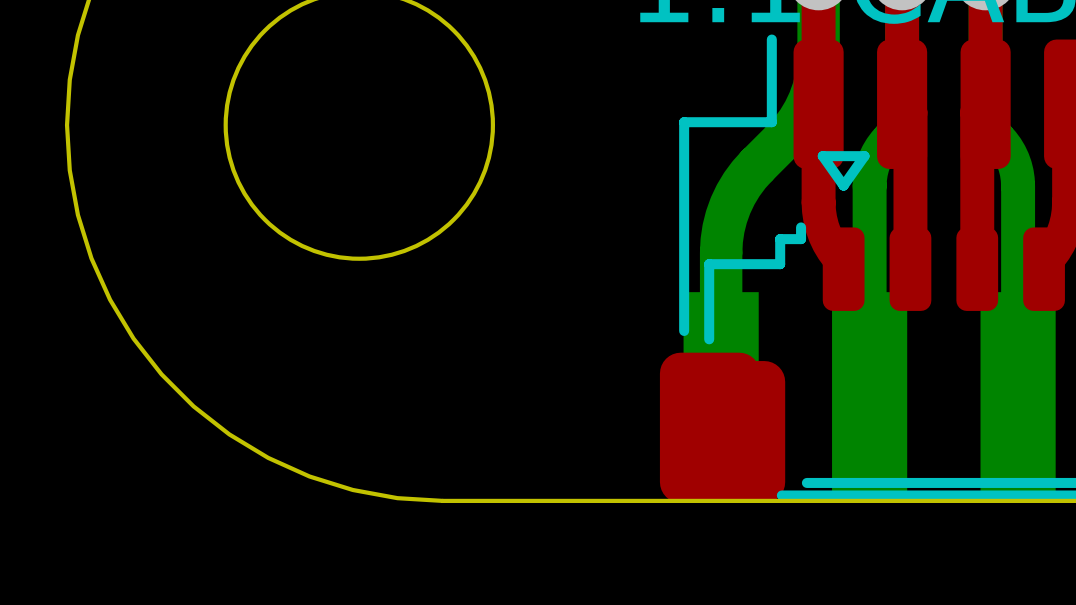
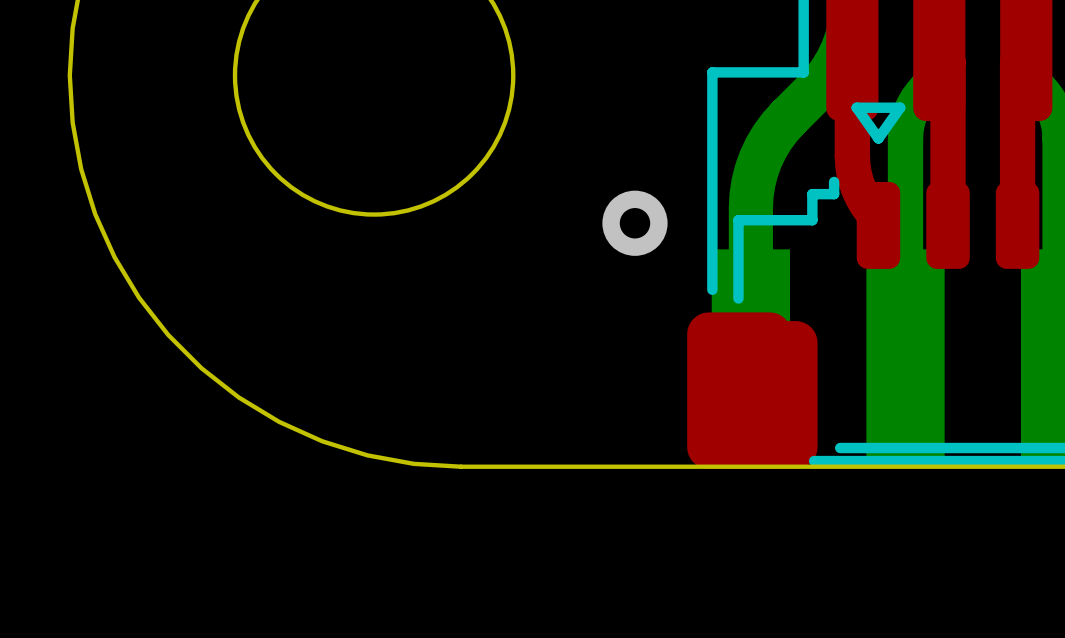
via: none -> (634, 223)

